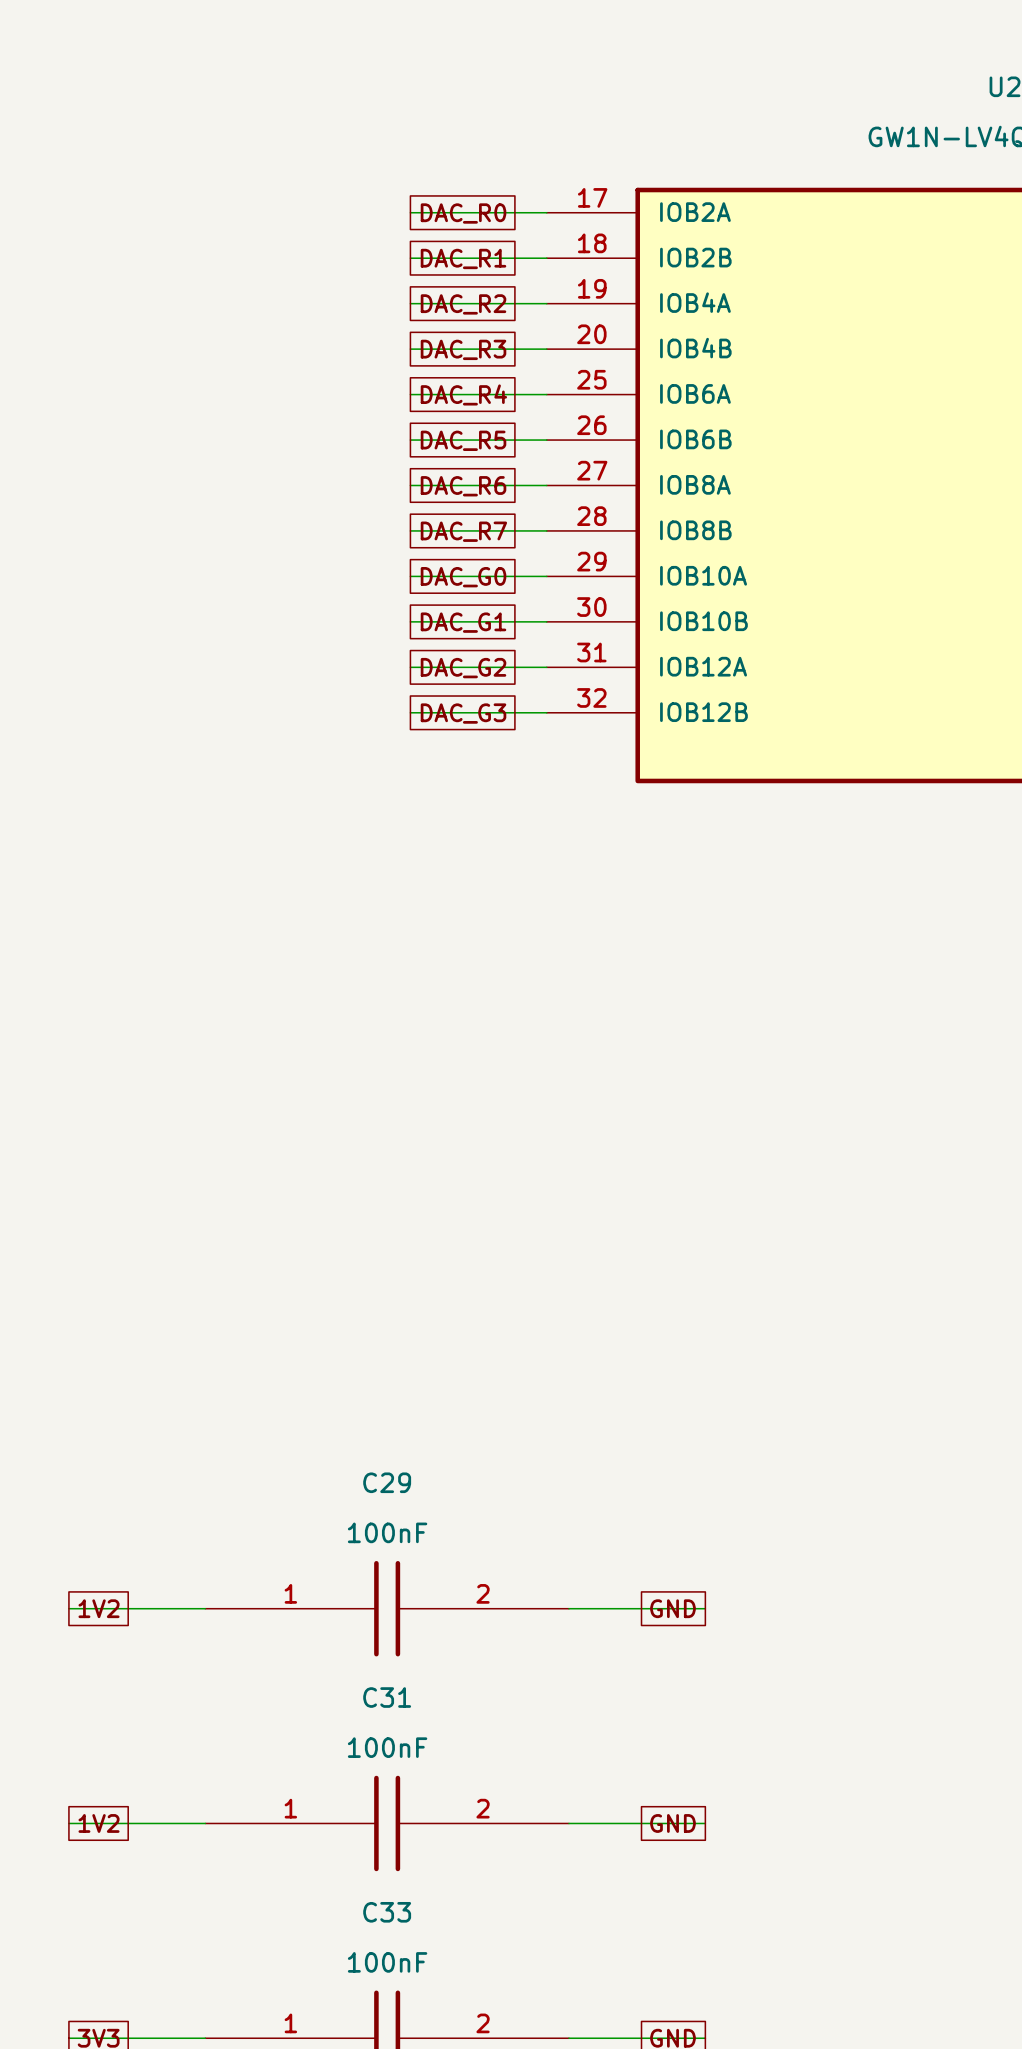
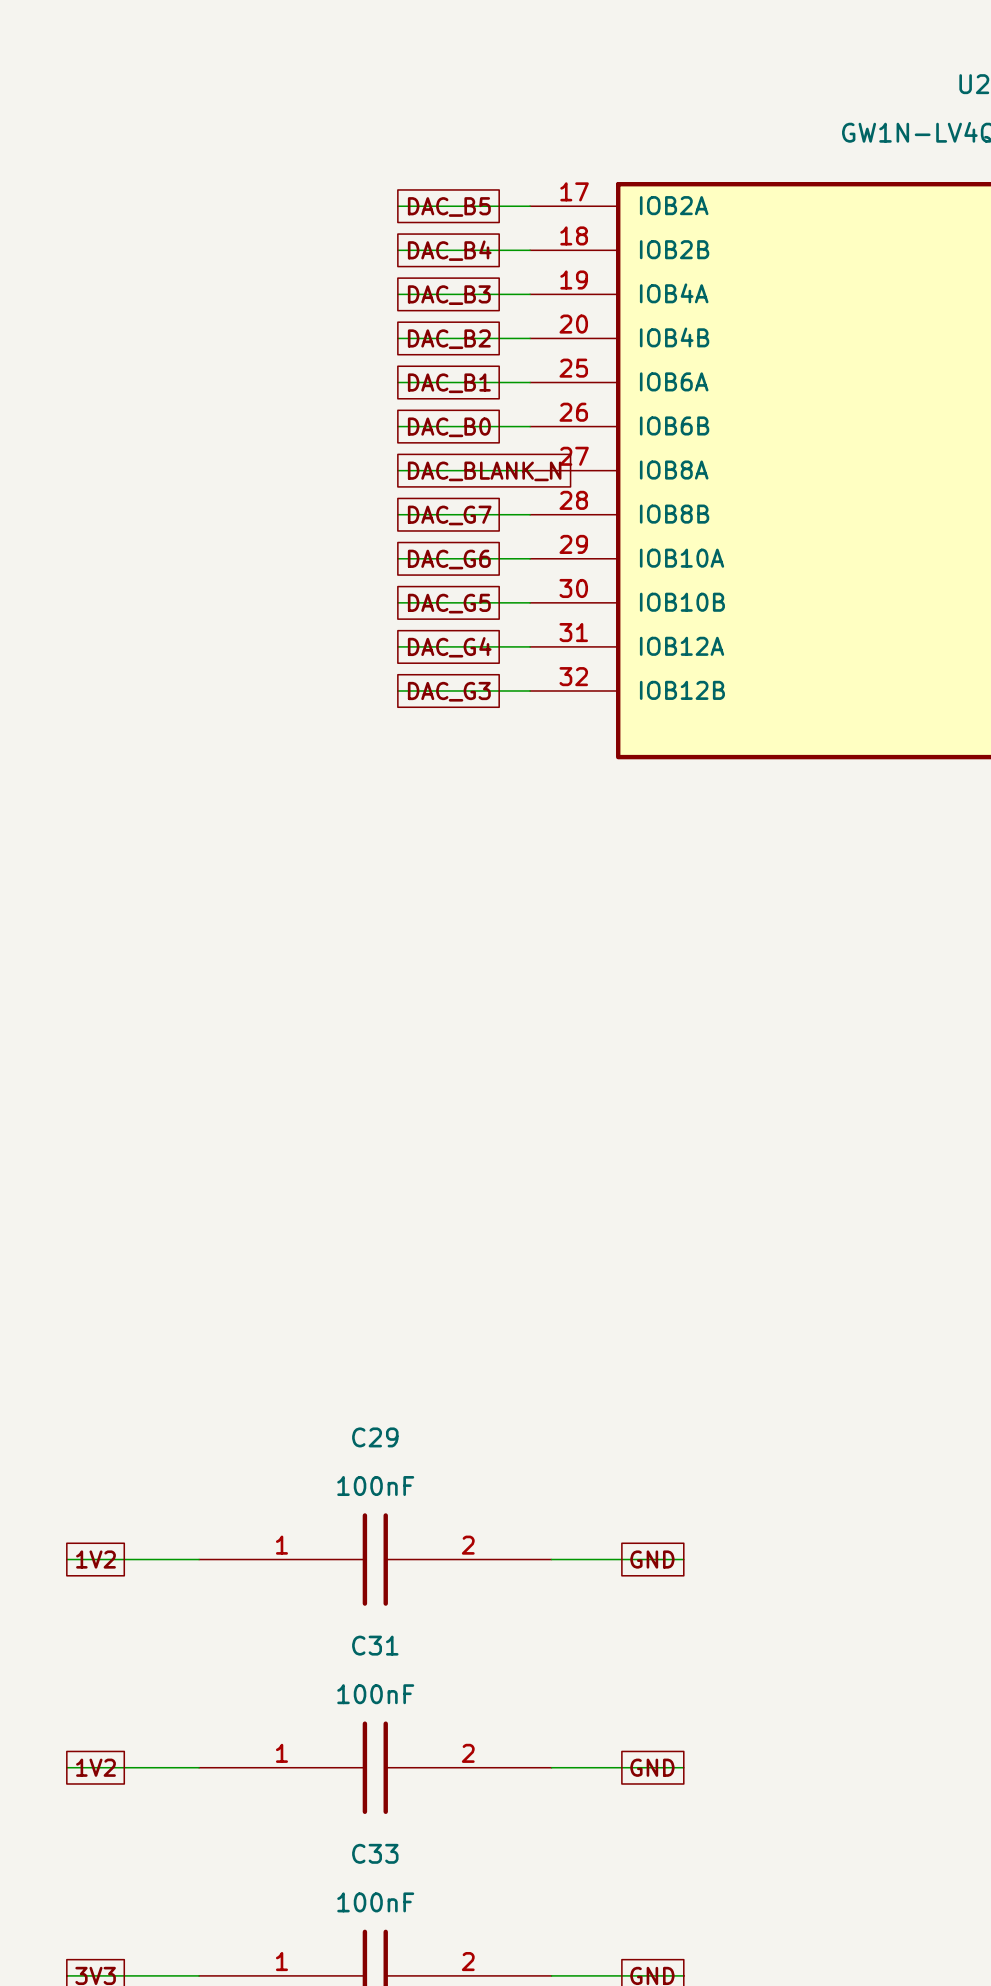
global label: DAC_R0 (463, 213) -> DAC_B5 (449, 206)
global label: DAC_R1 (463, 258) -> DAC_B4 (449, 250)
global label: DAC_R2 (463, 304) -> DAC_B3 (449, 295)
global label: DAC_R3 (463, 349) -> DAC_B2 (449, 339)
global label: DAC_R4 (463, 394) -> DAC_B1 (449, 383)
global label: DAC_R5 (463, 440) -> DAC_B0 (449, 427)
global label: DAC_R6 (463, 486) -> DAC_BLANK_N (484, 471)
global label: DAC_R7 (463, 531) -> DAC_G7 (449, 515)
global label: DAC_G0 (463, 577) -> DAC_G6 (449, 559)
global label: DAC_G1 (463, 622) -> DAC_G5 (449, 603)
global label: DAC_G2 (463, 668) -> DAC_G4 (449, 647)

